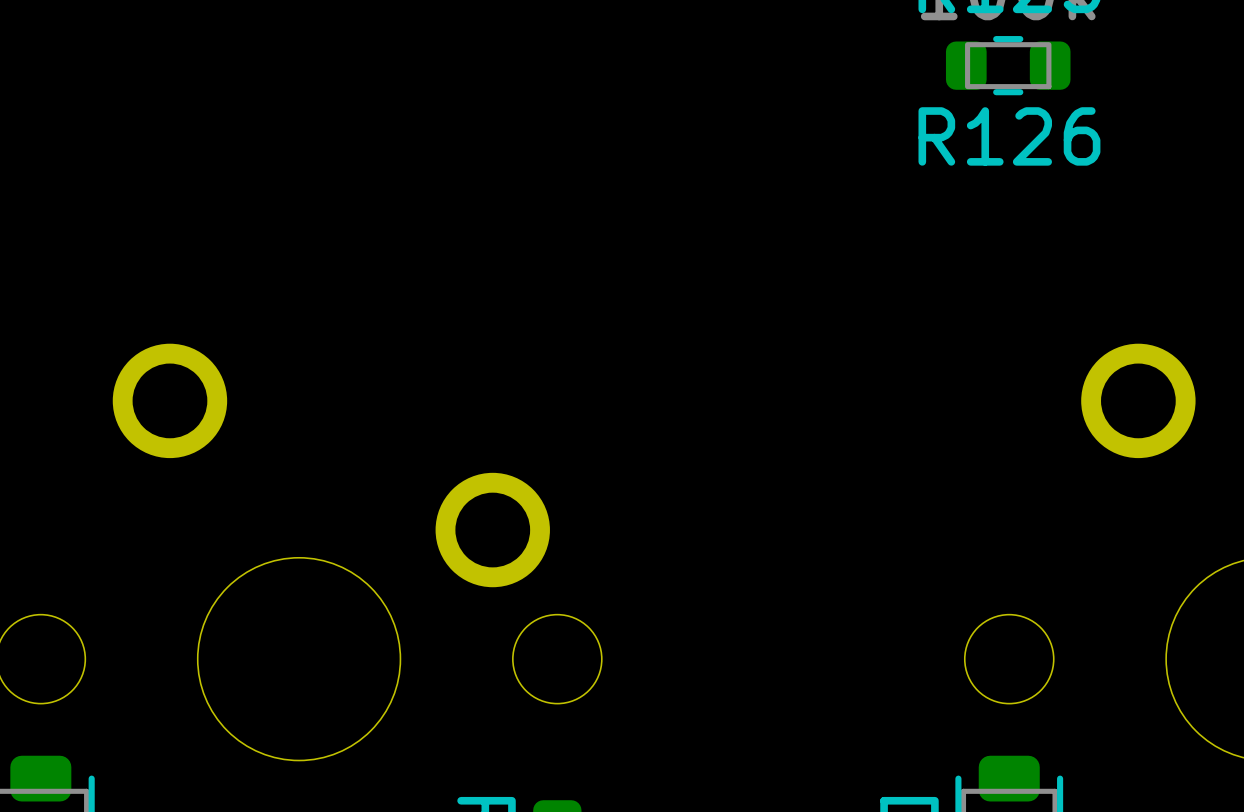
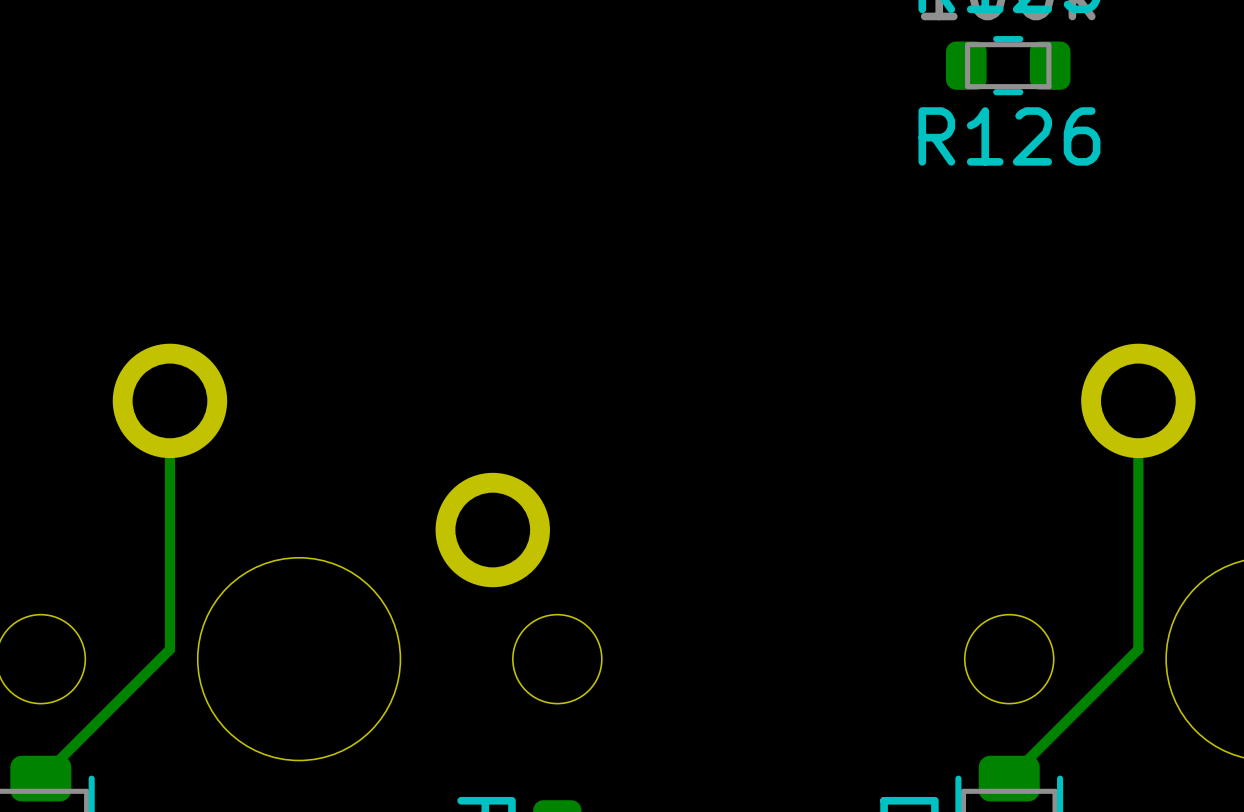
track: none -> (169, 400) (169, 649) (40, 778)
track: none -> (1138, 400) (1138, 649) (1009, 778)

